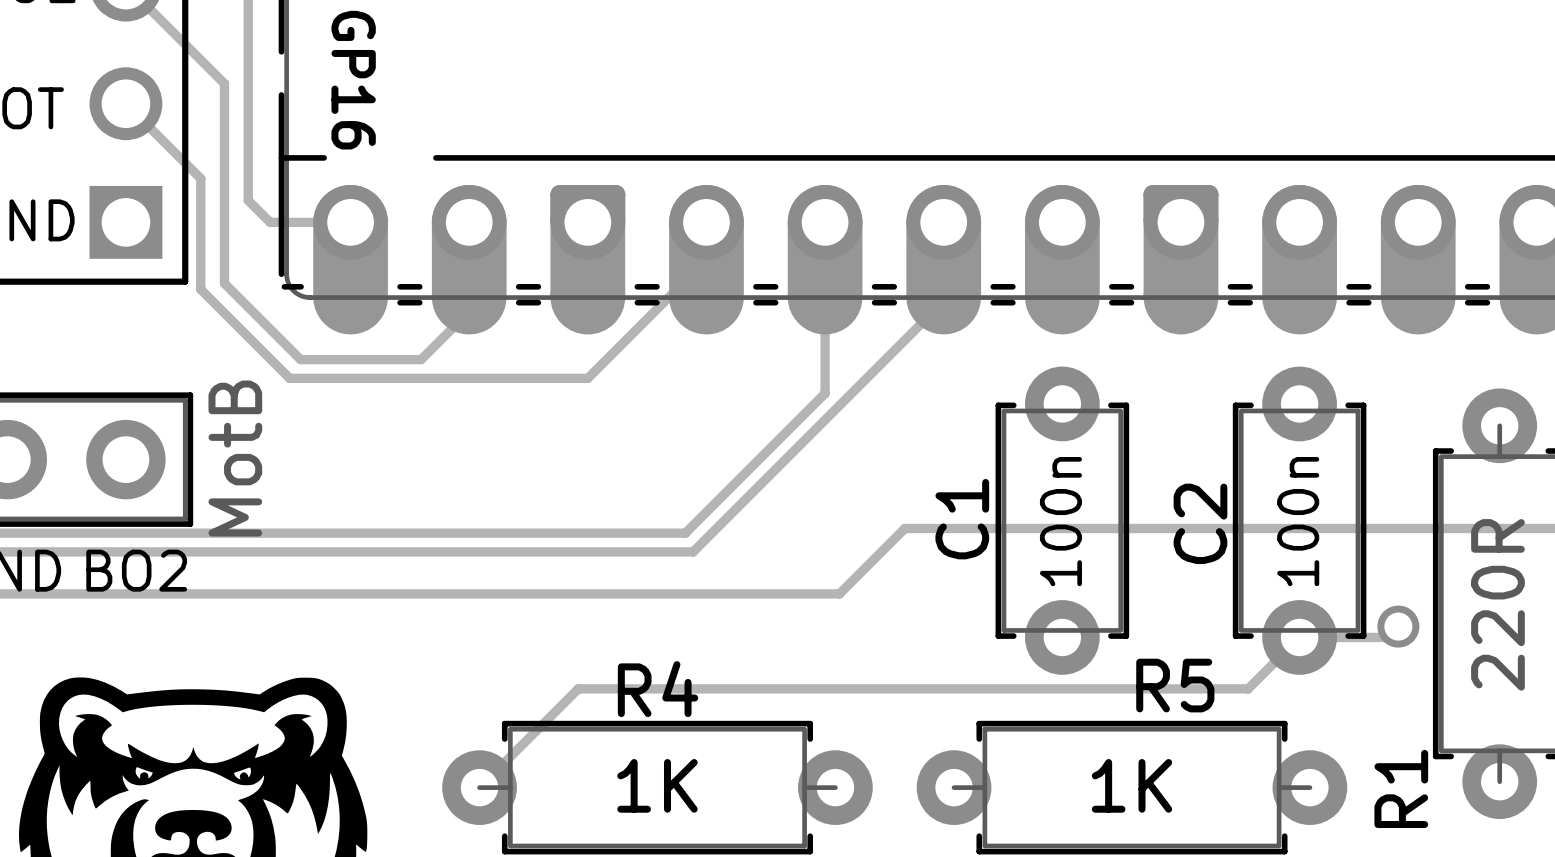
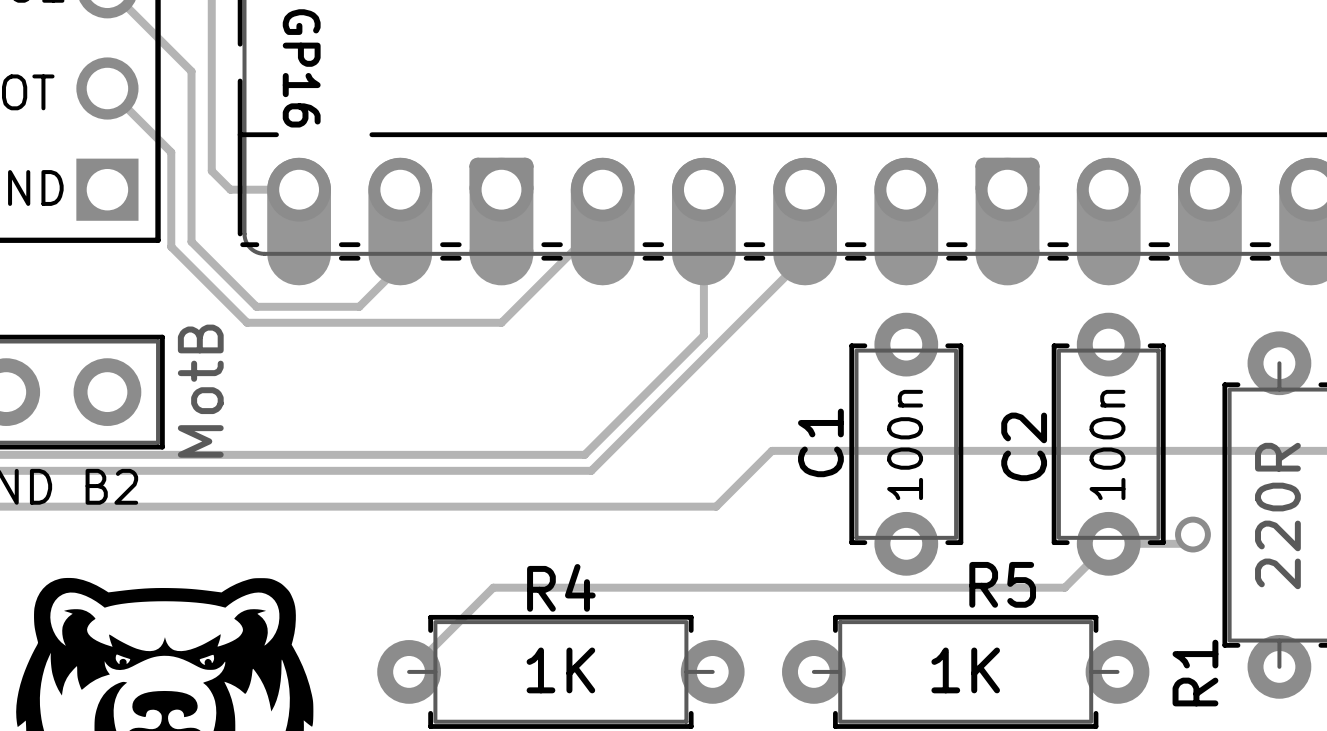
text: BO2 (136, 570) -> B2 (111, 486)

